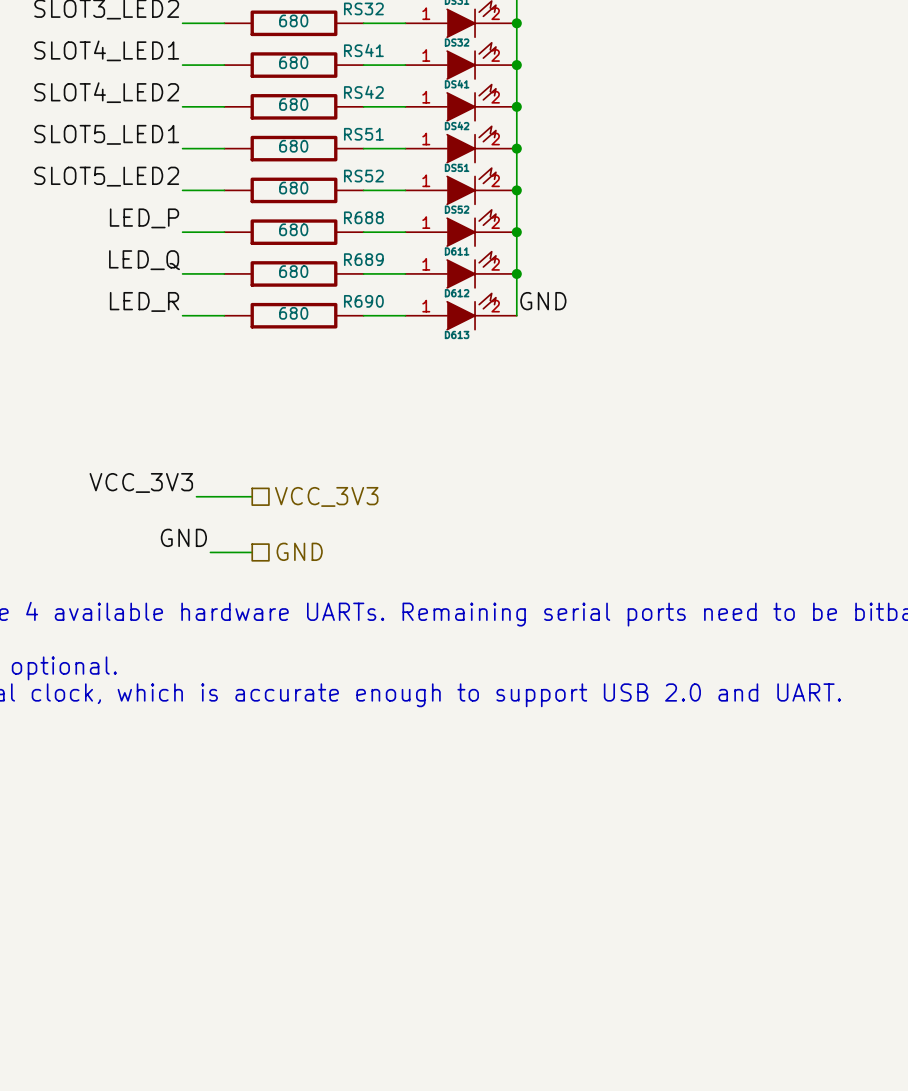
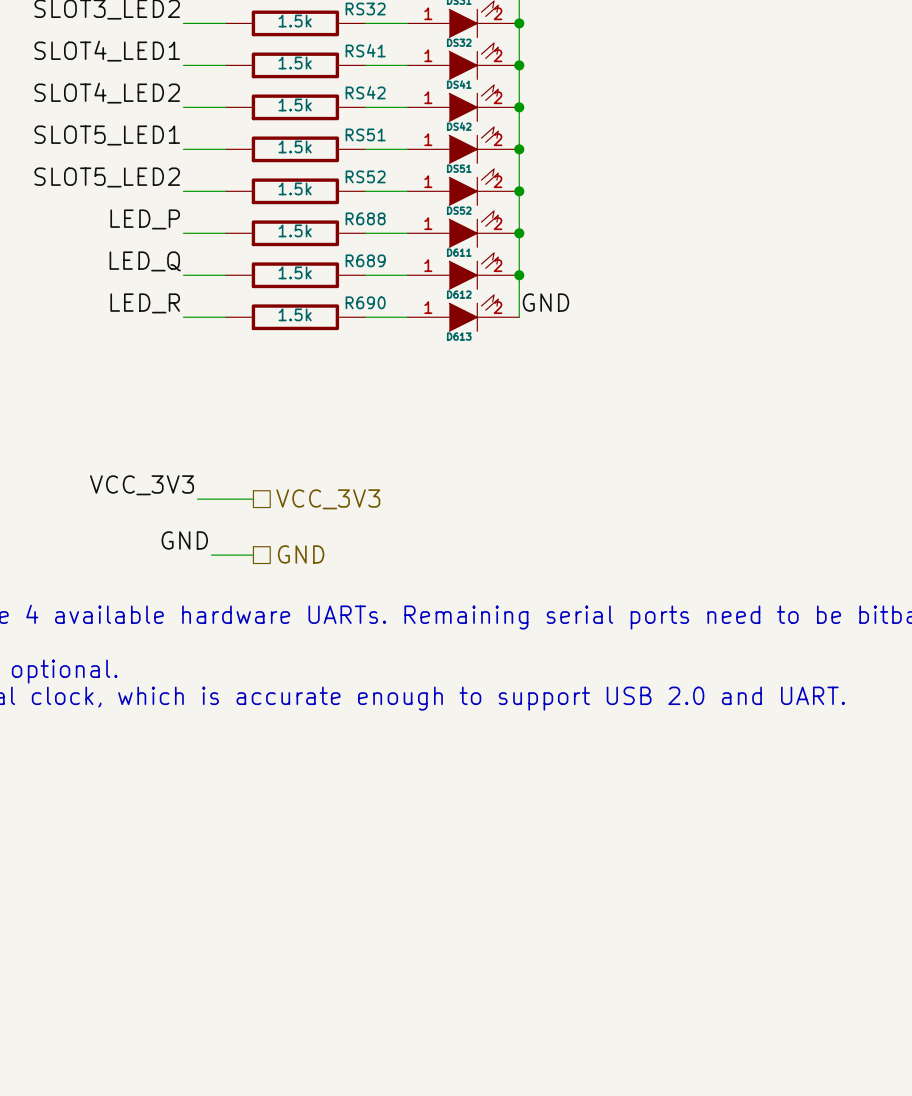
RS32 value: 680 (293, 20) -> 1.5k (295, 21)
RS41 value: 680 (293, 62) -> 1.5k (295, 63)
RS42 value: 680 (293, 104) -> 1.5k (295, 104)
RS51 value: 680 (293, 146) -> 1.5k (295, 146)
RS52 value: 680 (293, 188) -> 1.5k (295, 188)
R688 value: 680 (293, 229) -> 1.5k (295, 230)
R689 value: 680 (293, 271) -> 1.5k (295, 272)
R690 value: 680 (293, 313) -> 1.5k (295, 314)

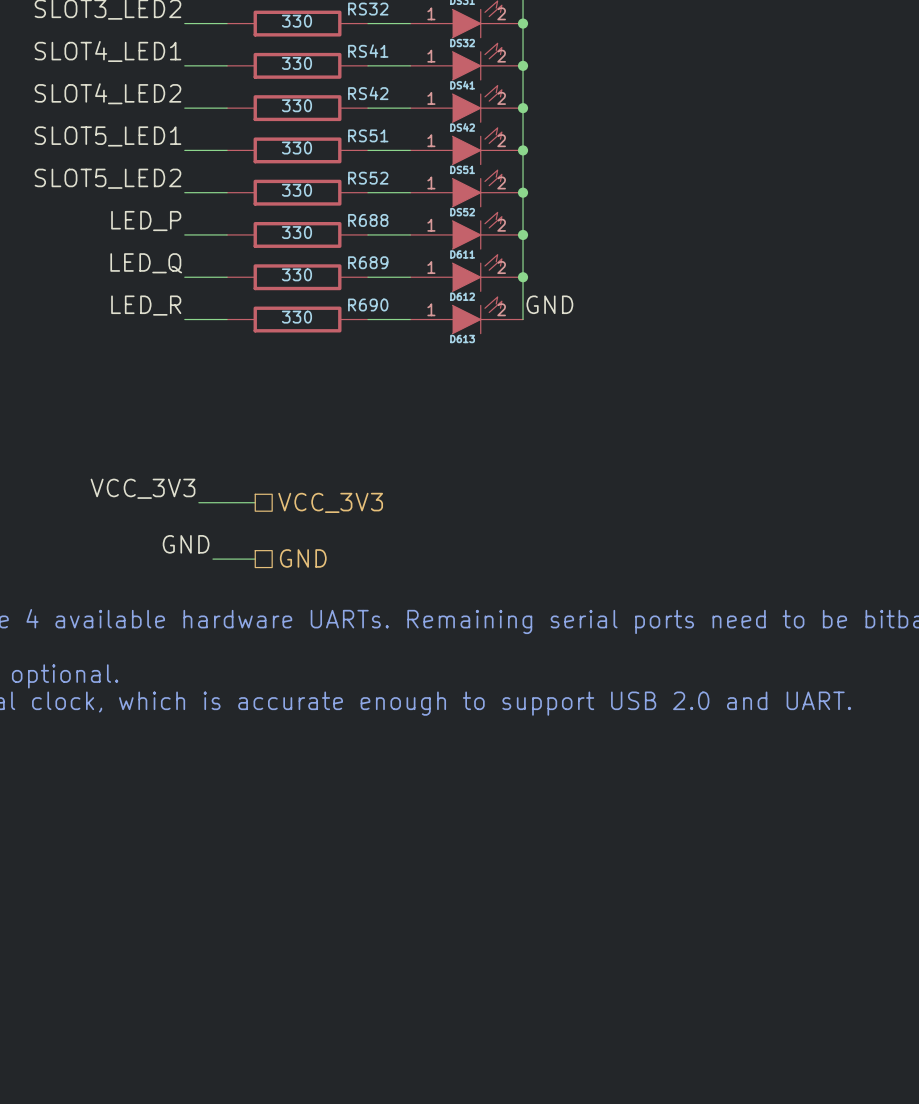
RS32 value: 1.5k (295, 21) -> 330 (296, 21)
RS41 value: 1.5k (295, 63) -> 330 (296, 63)
RS42 value: 1.5k (295, 104) -> 330 (296, 105)
RS51 value: 1.5k (295, 146) -> 330 (296, 148)
RS52 value: 1.5k (295, 188) -> 330 (296, 190)
R688 value: 1.5k (295, 230) -> 330 (296, 232)
R689 value: 1.5k (295, 272) -> 330 (296, 274)
R690 value: 1.5k (295, 314) -> 330 (296, 317)

